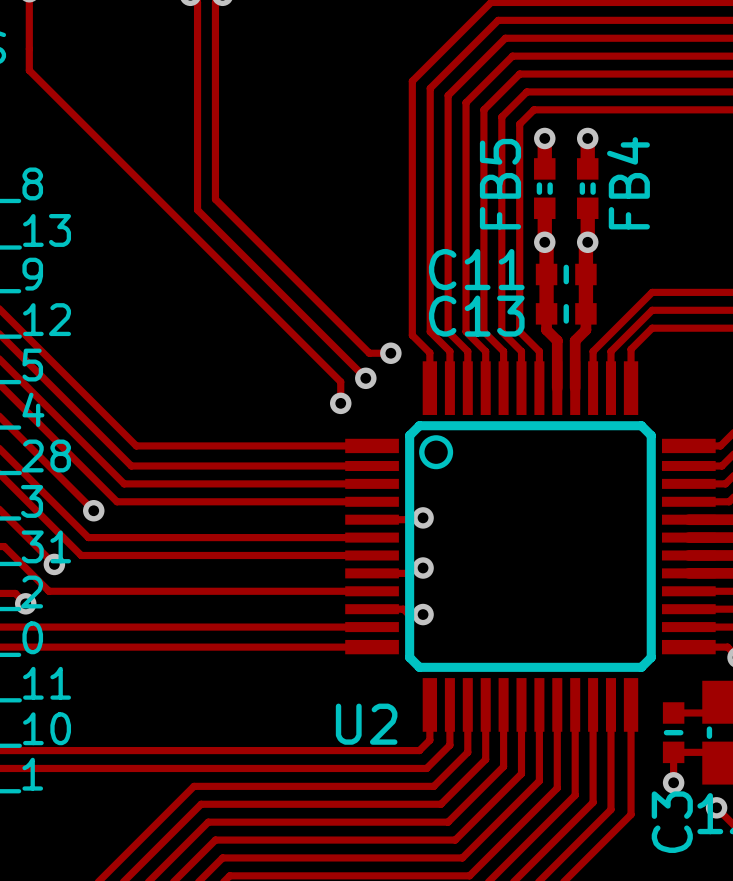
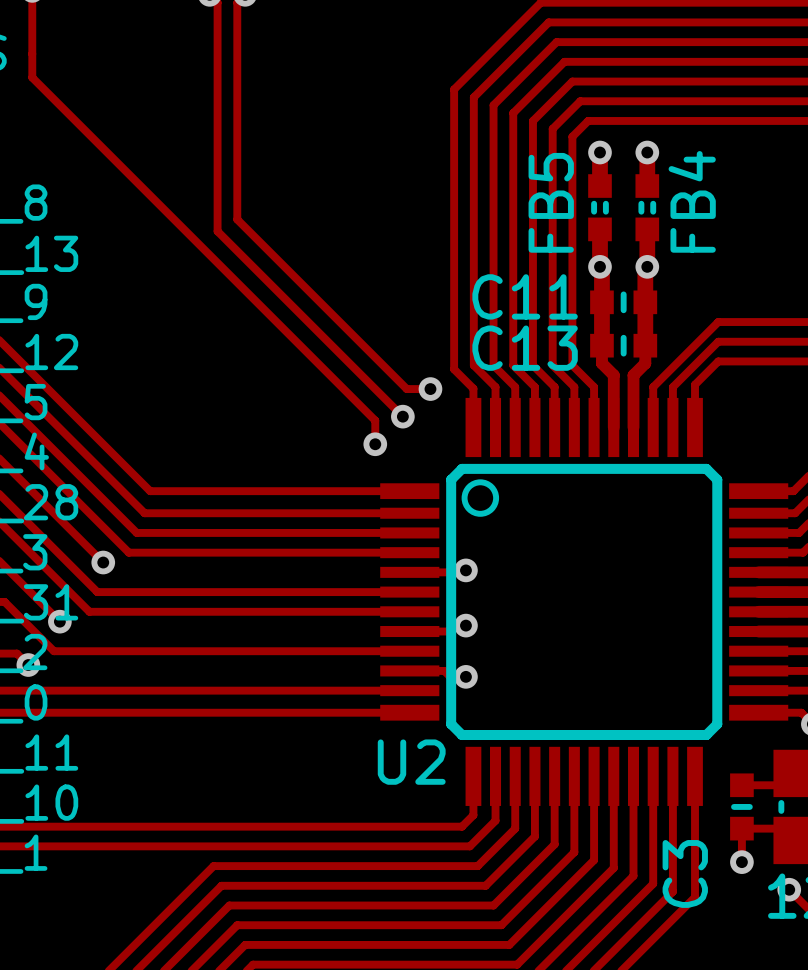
U2 name position: U2 (366, 724) -> U2 (411, 762)
C3 name position: C3 (672, 822) -> C3 (685, 873)

